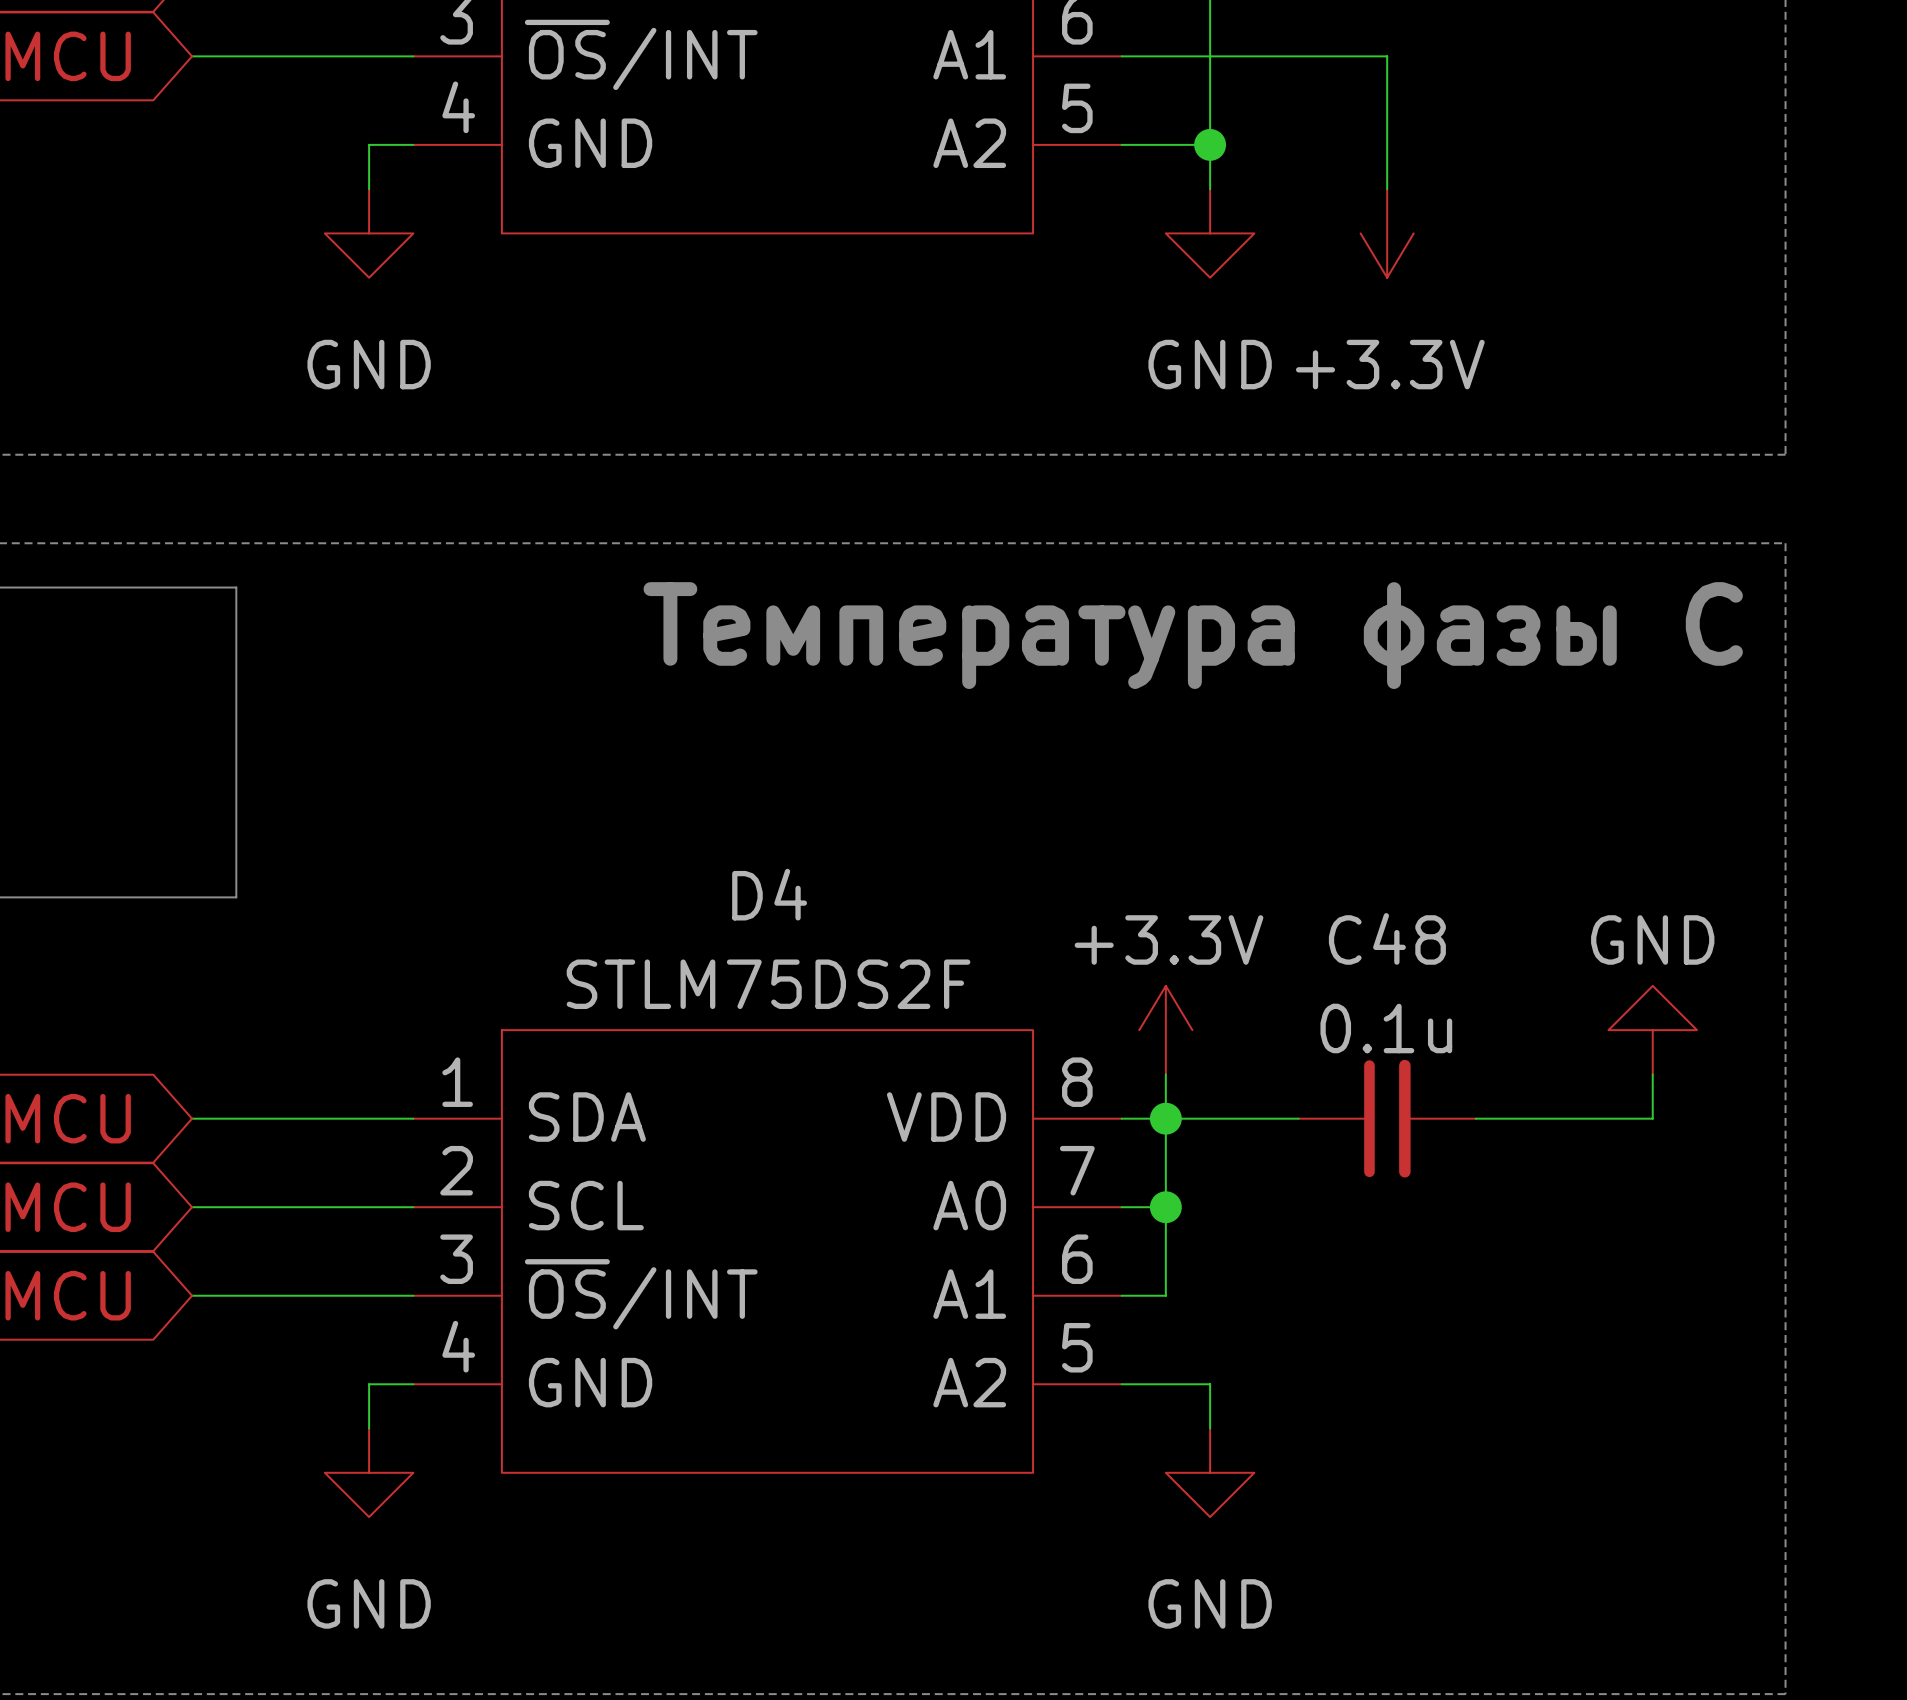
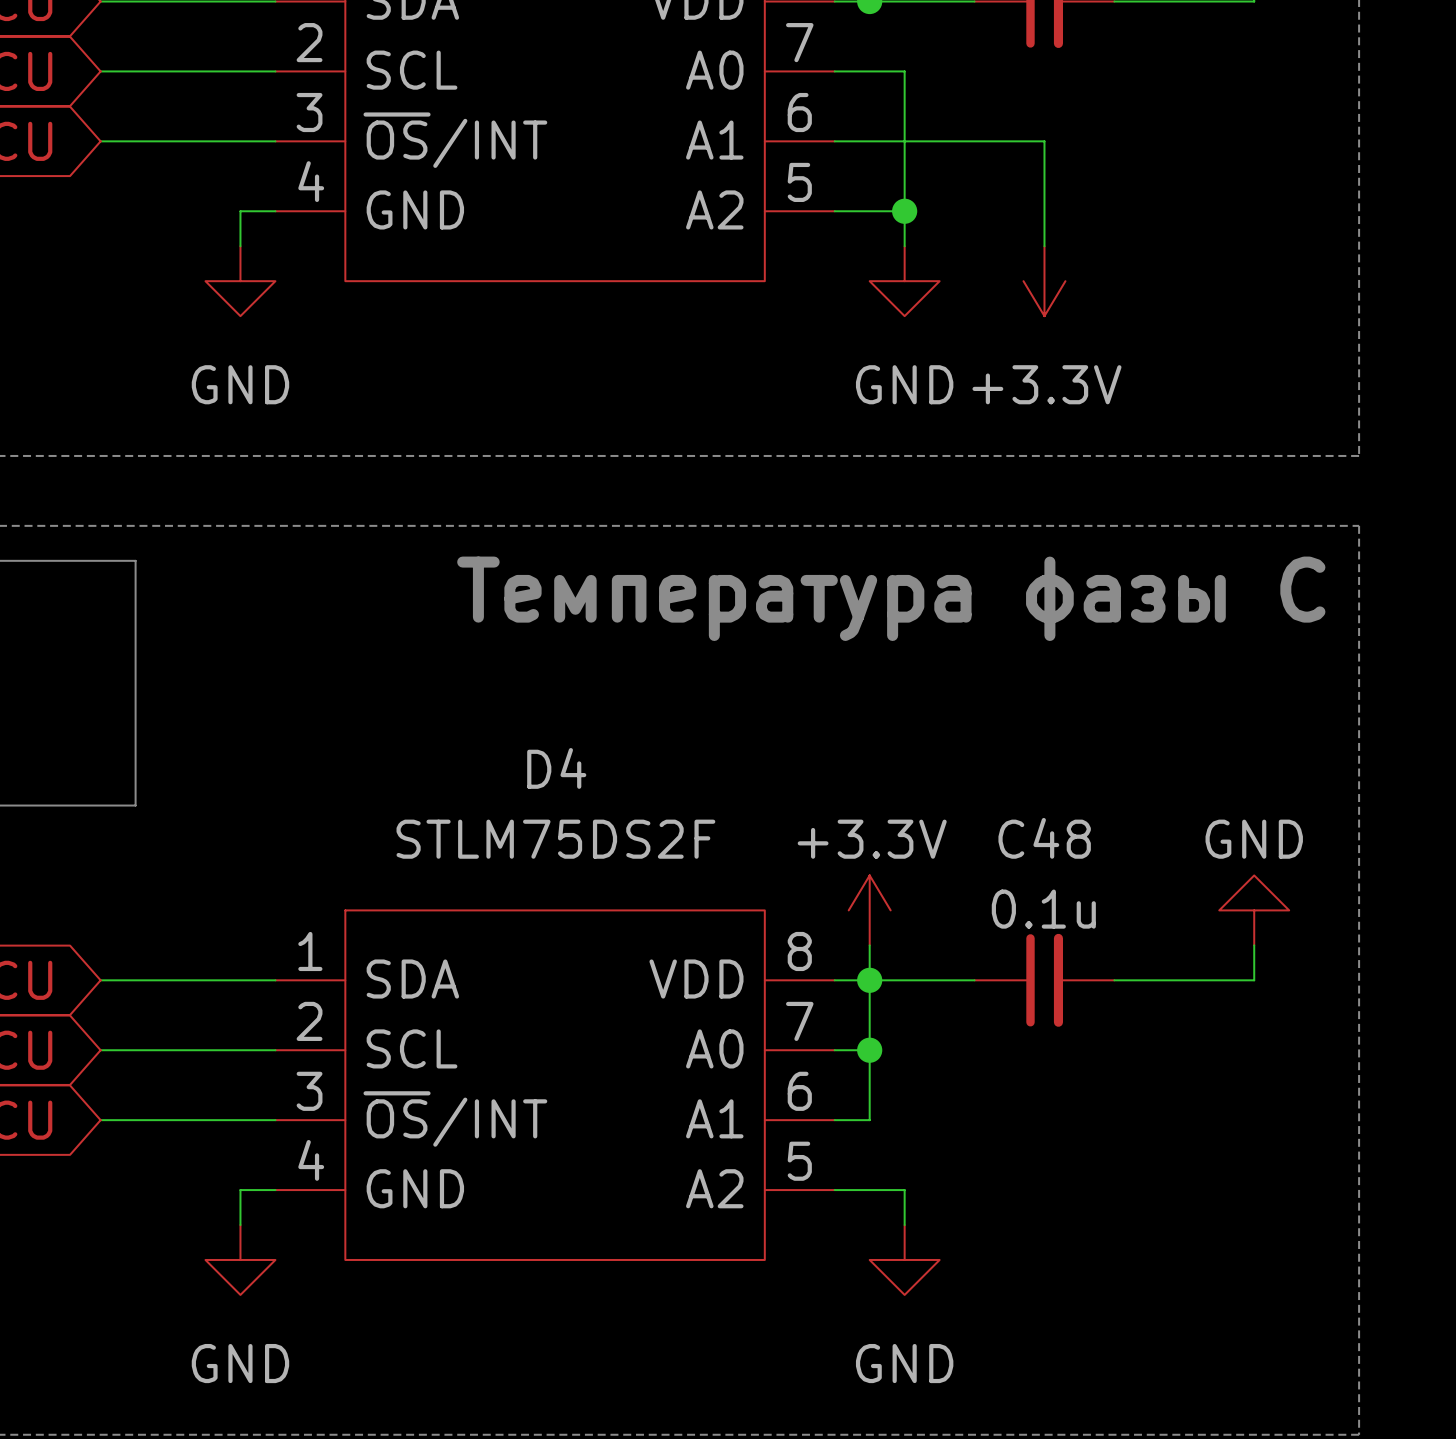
D4 name position: D4 (769, 894) -> D4 (556, 768)
D4 value position: STLM75DS2F (768, 984) -> STLM75DS2F (555, 839)

